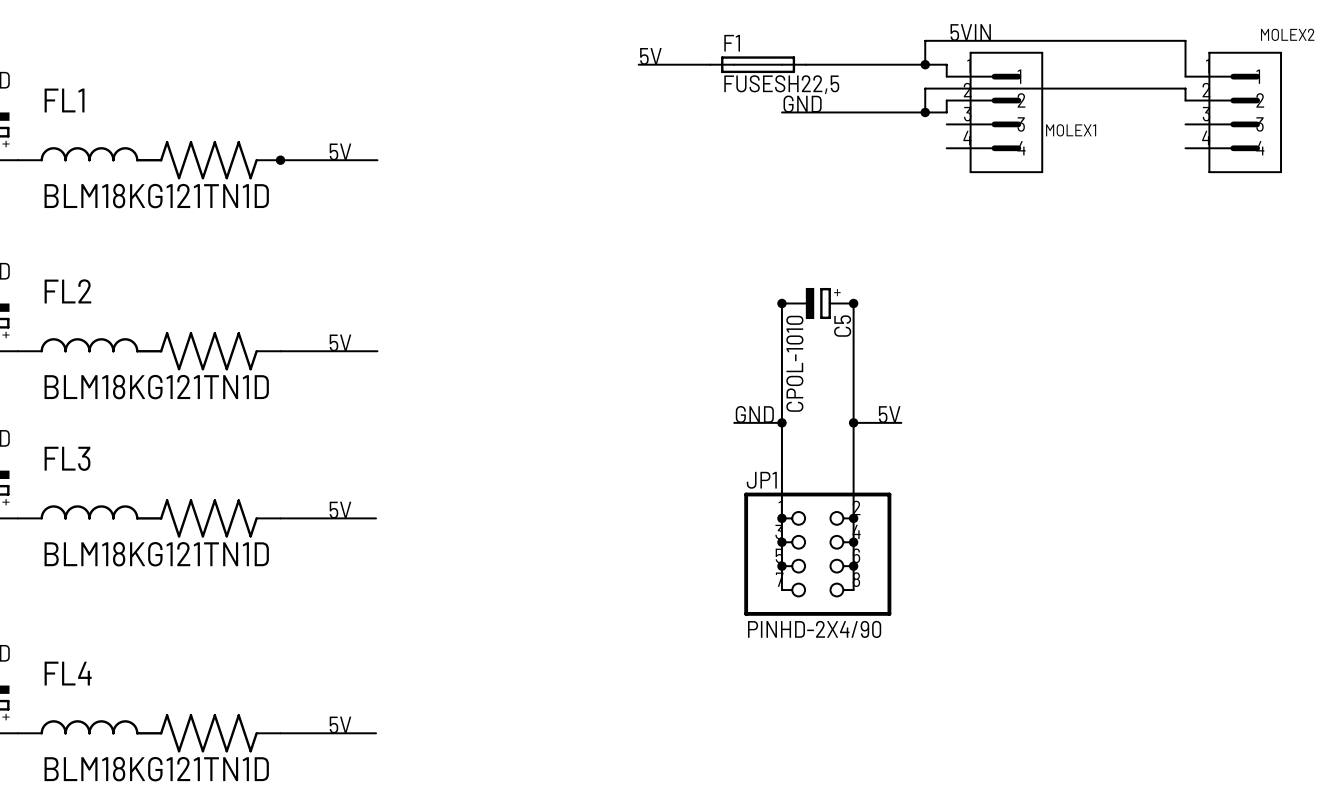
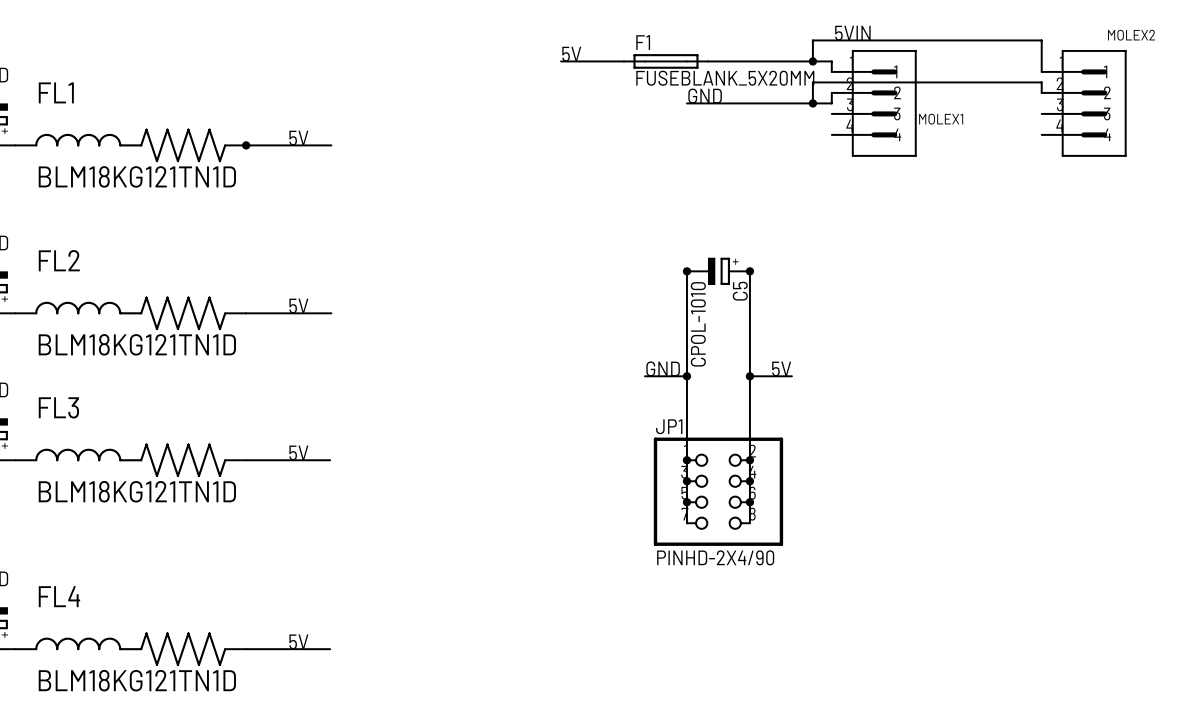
F1 value: FUSESH22,5 (781, 84) -> FUSEBLANK_5X20MM (725, 78)

